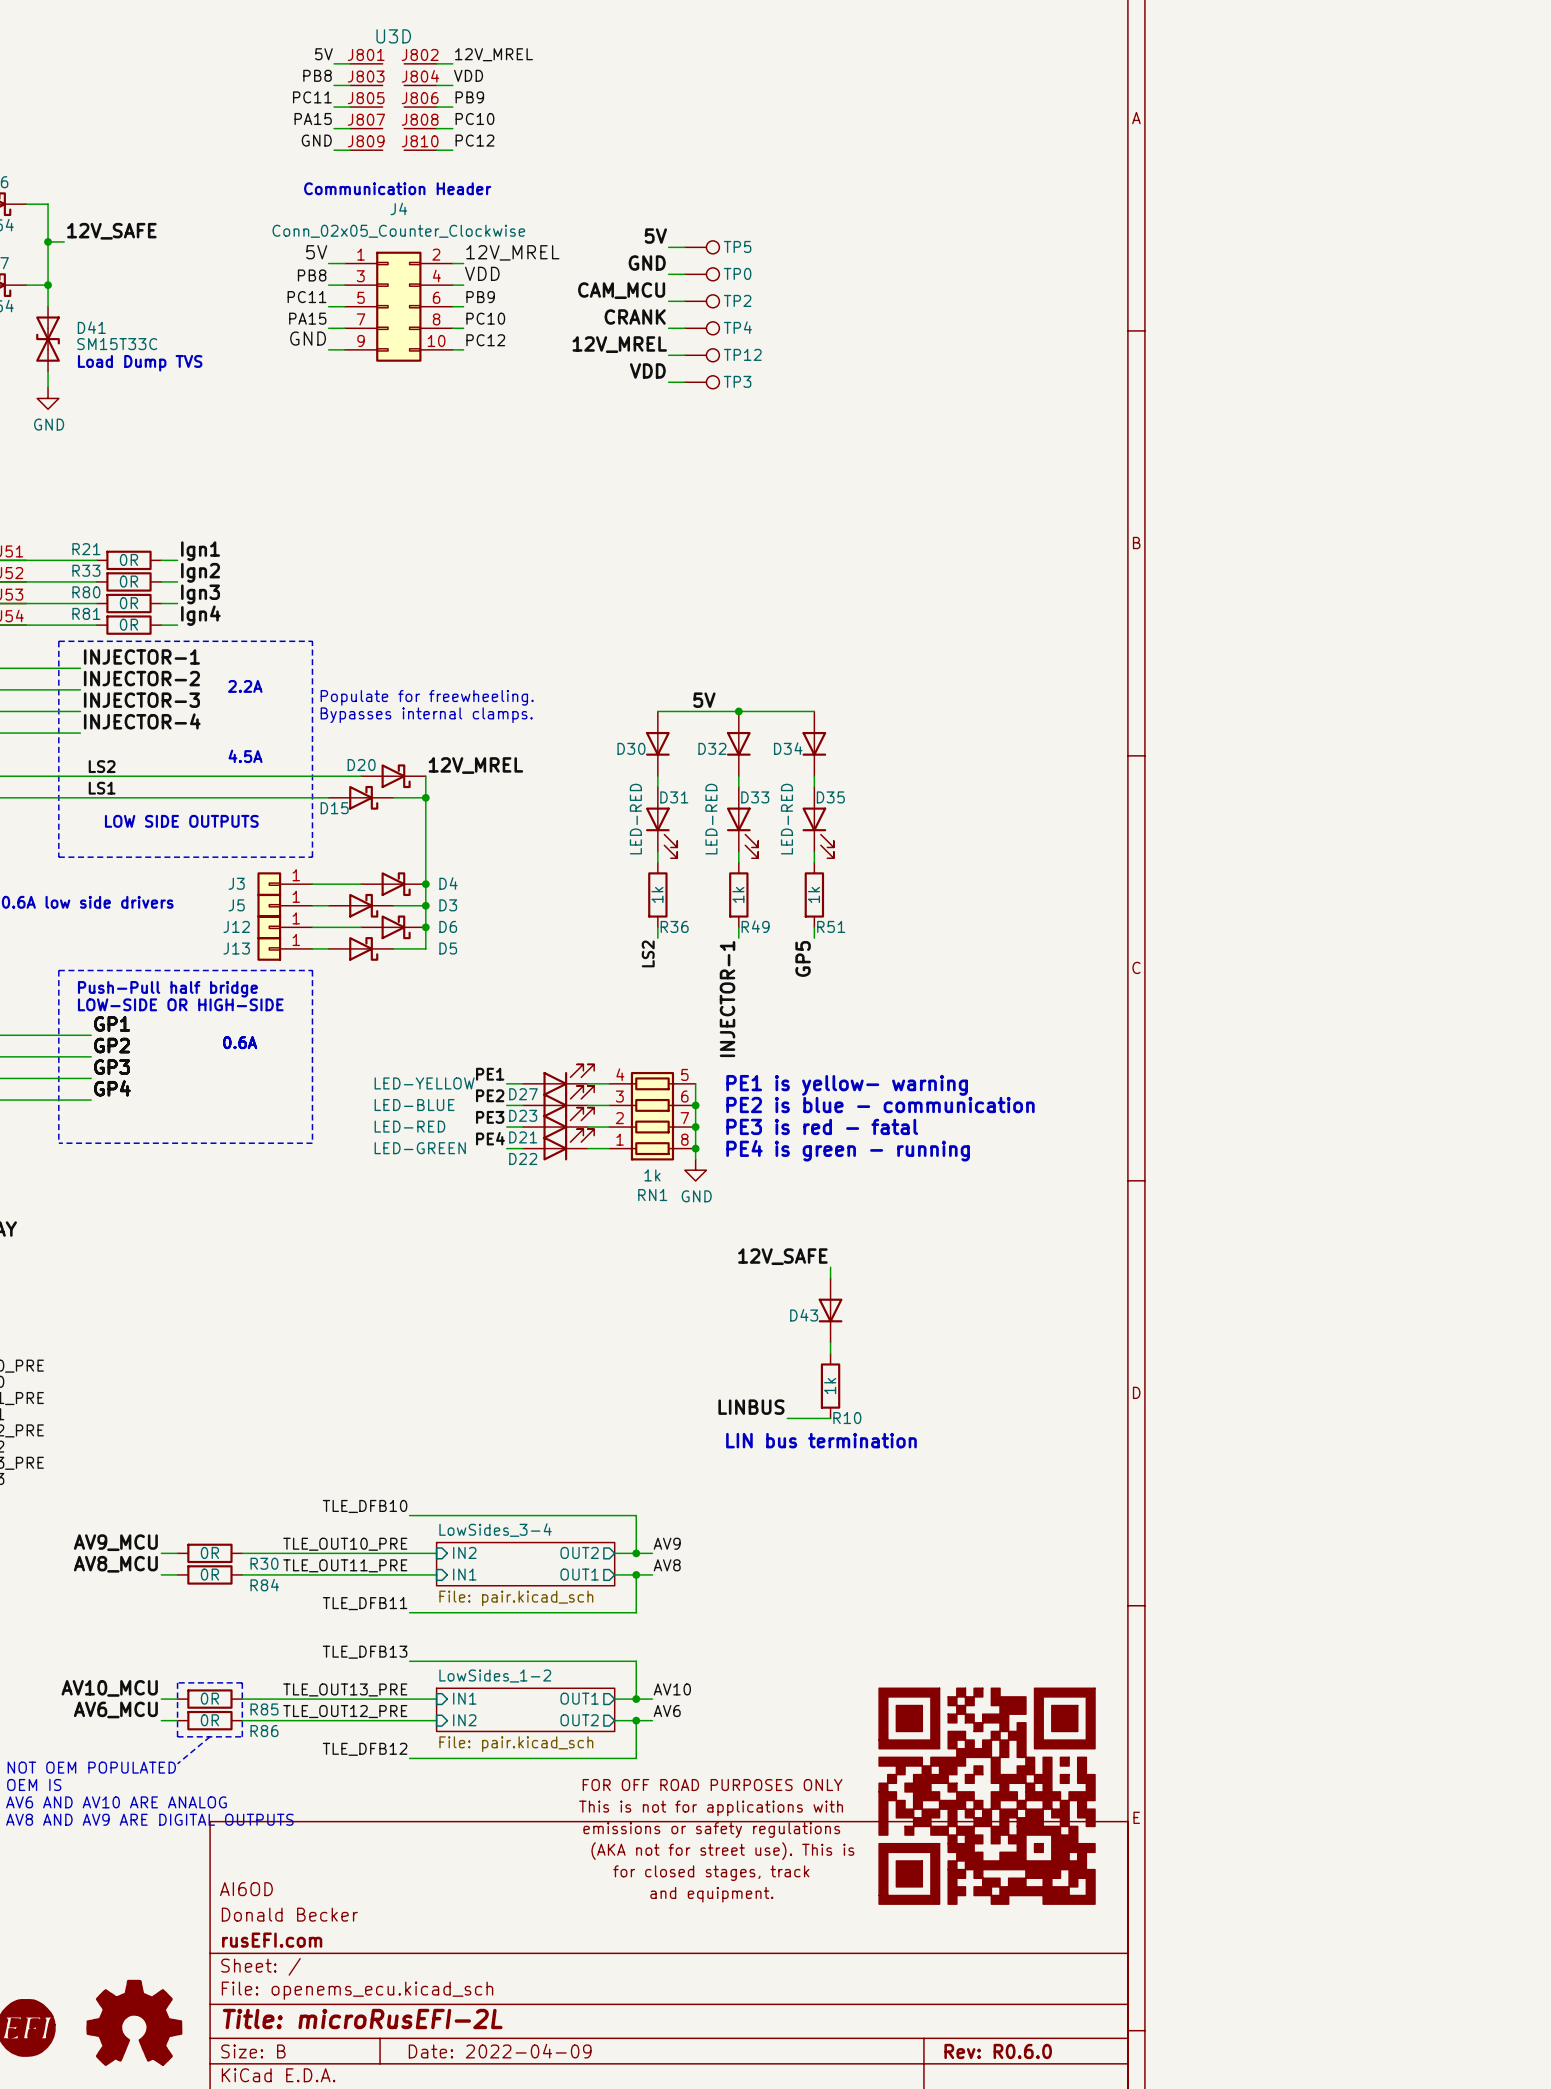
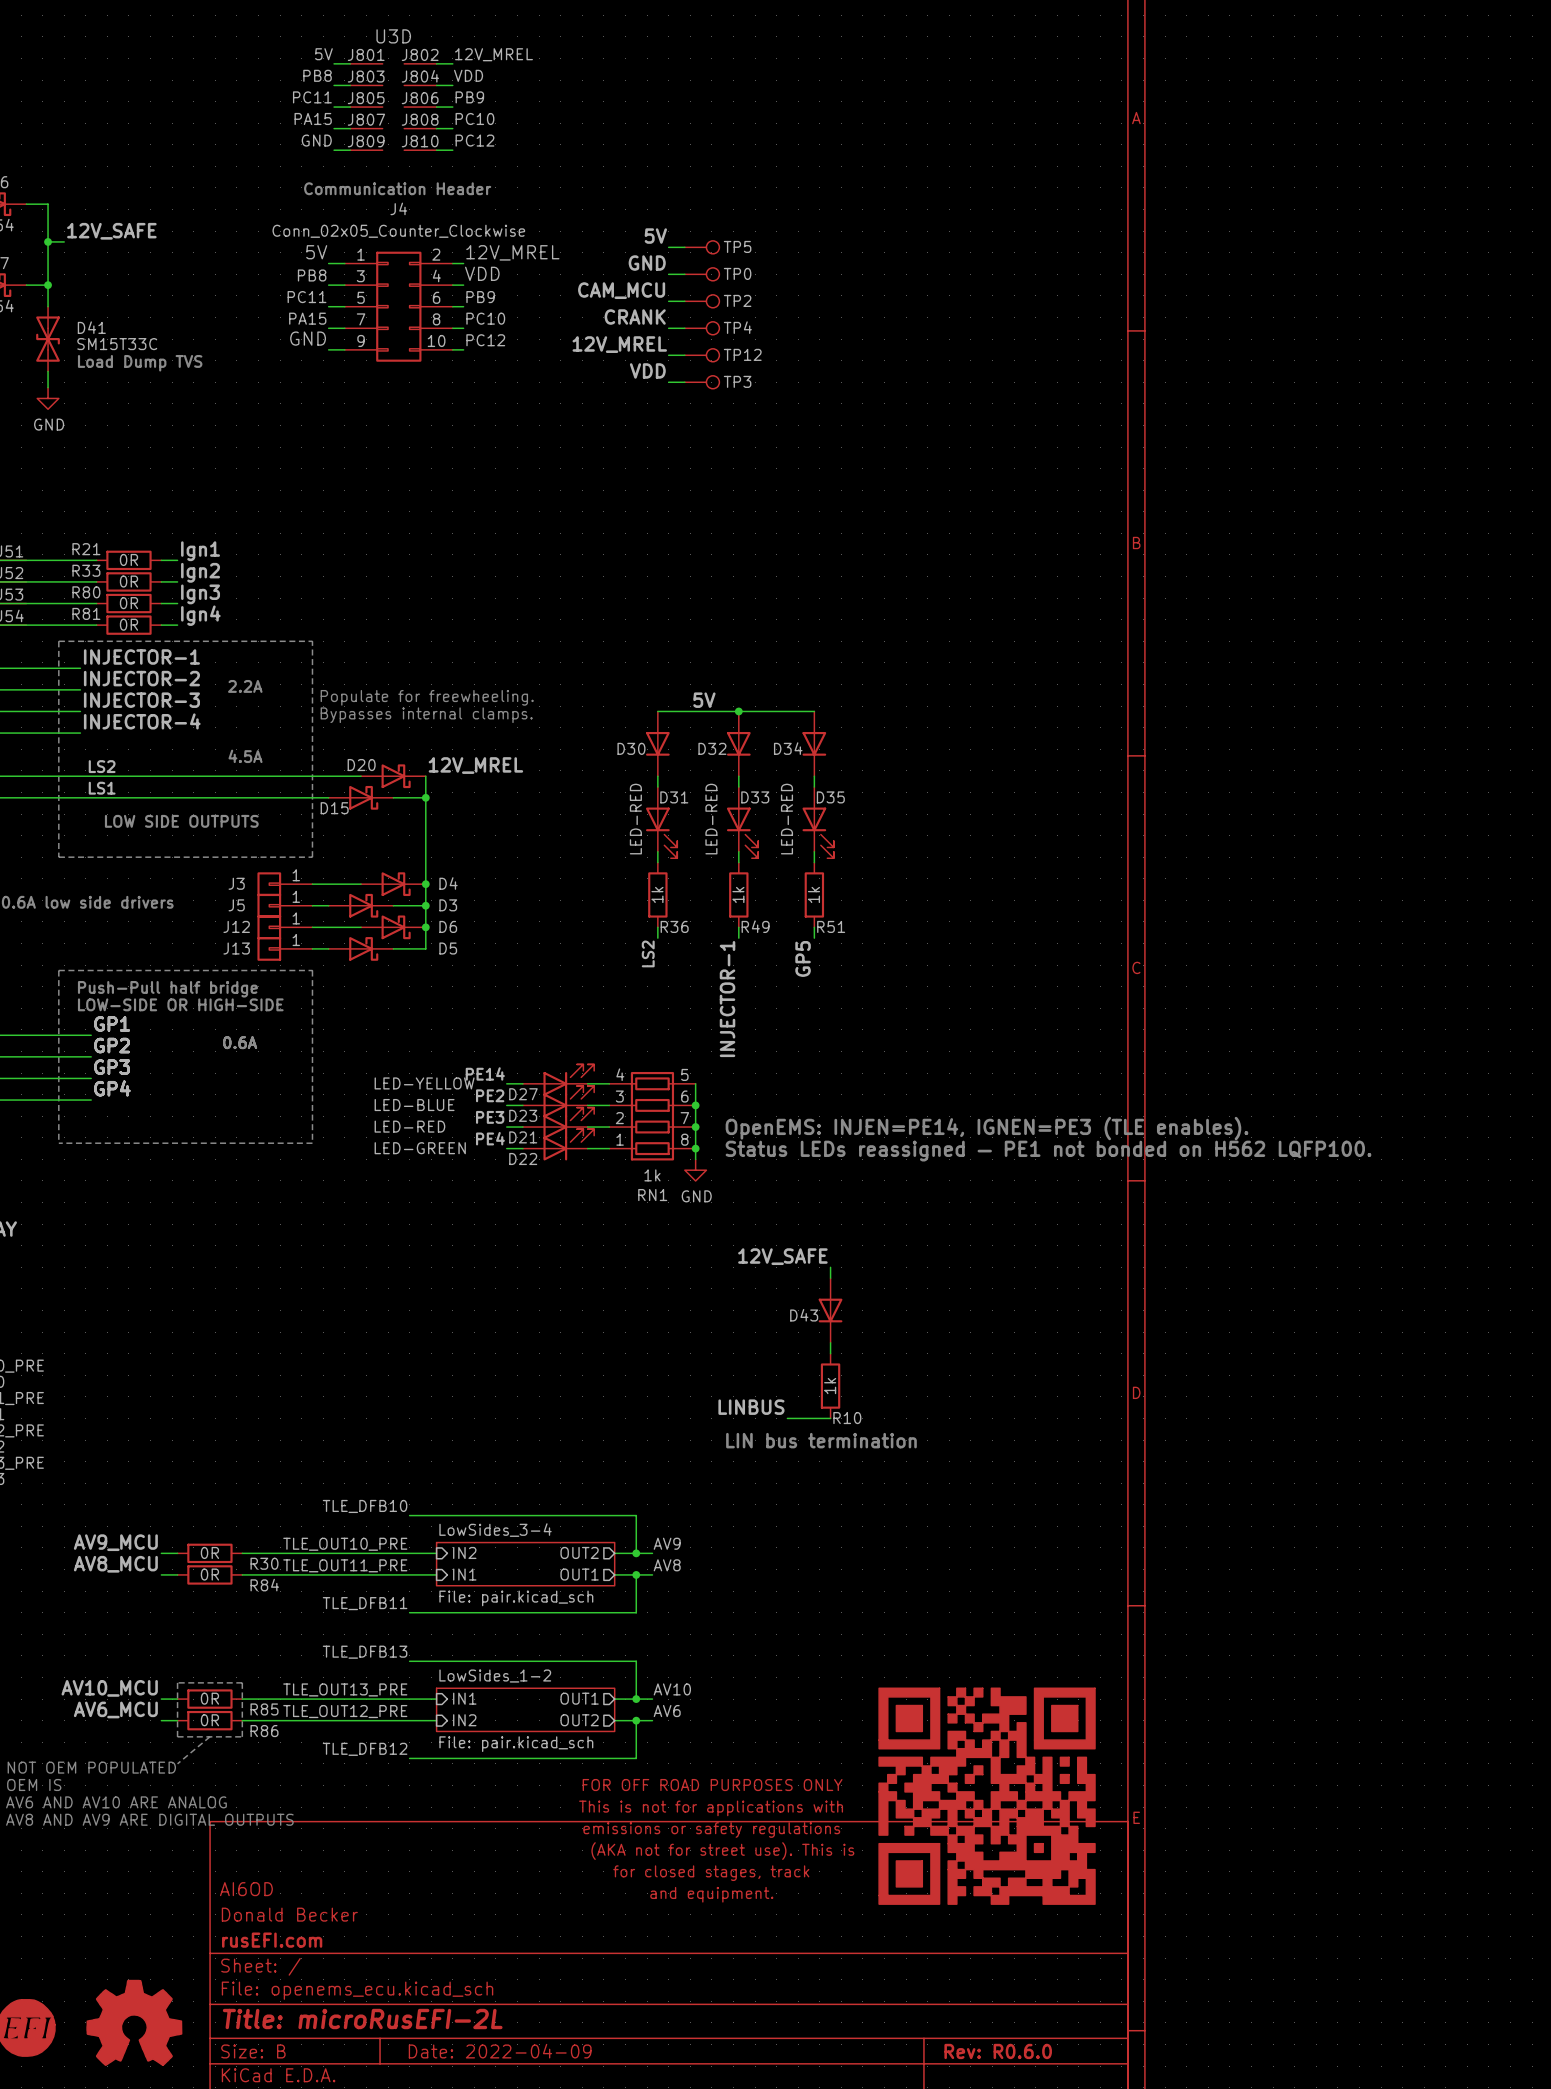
label: PE1 (490, 1074) -> PE14 (485, 1073)
text: PE1 is yellow- warning (847, 1085) -> none
text: PE2 is blue - communication (880, 1105) -> none
text: PE3 is red - fatal (822, 1126) -> OpenEMS: INJEN=PE14, IGNEN=PE3 (TLE enables). (987, 1128)
text: PE4 is green - running (848, 1150) -> Status LEDs reassigned — PE1 not bonded on H562 LQFP100. (1048, 1151)

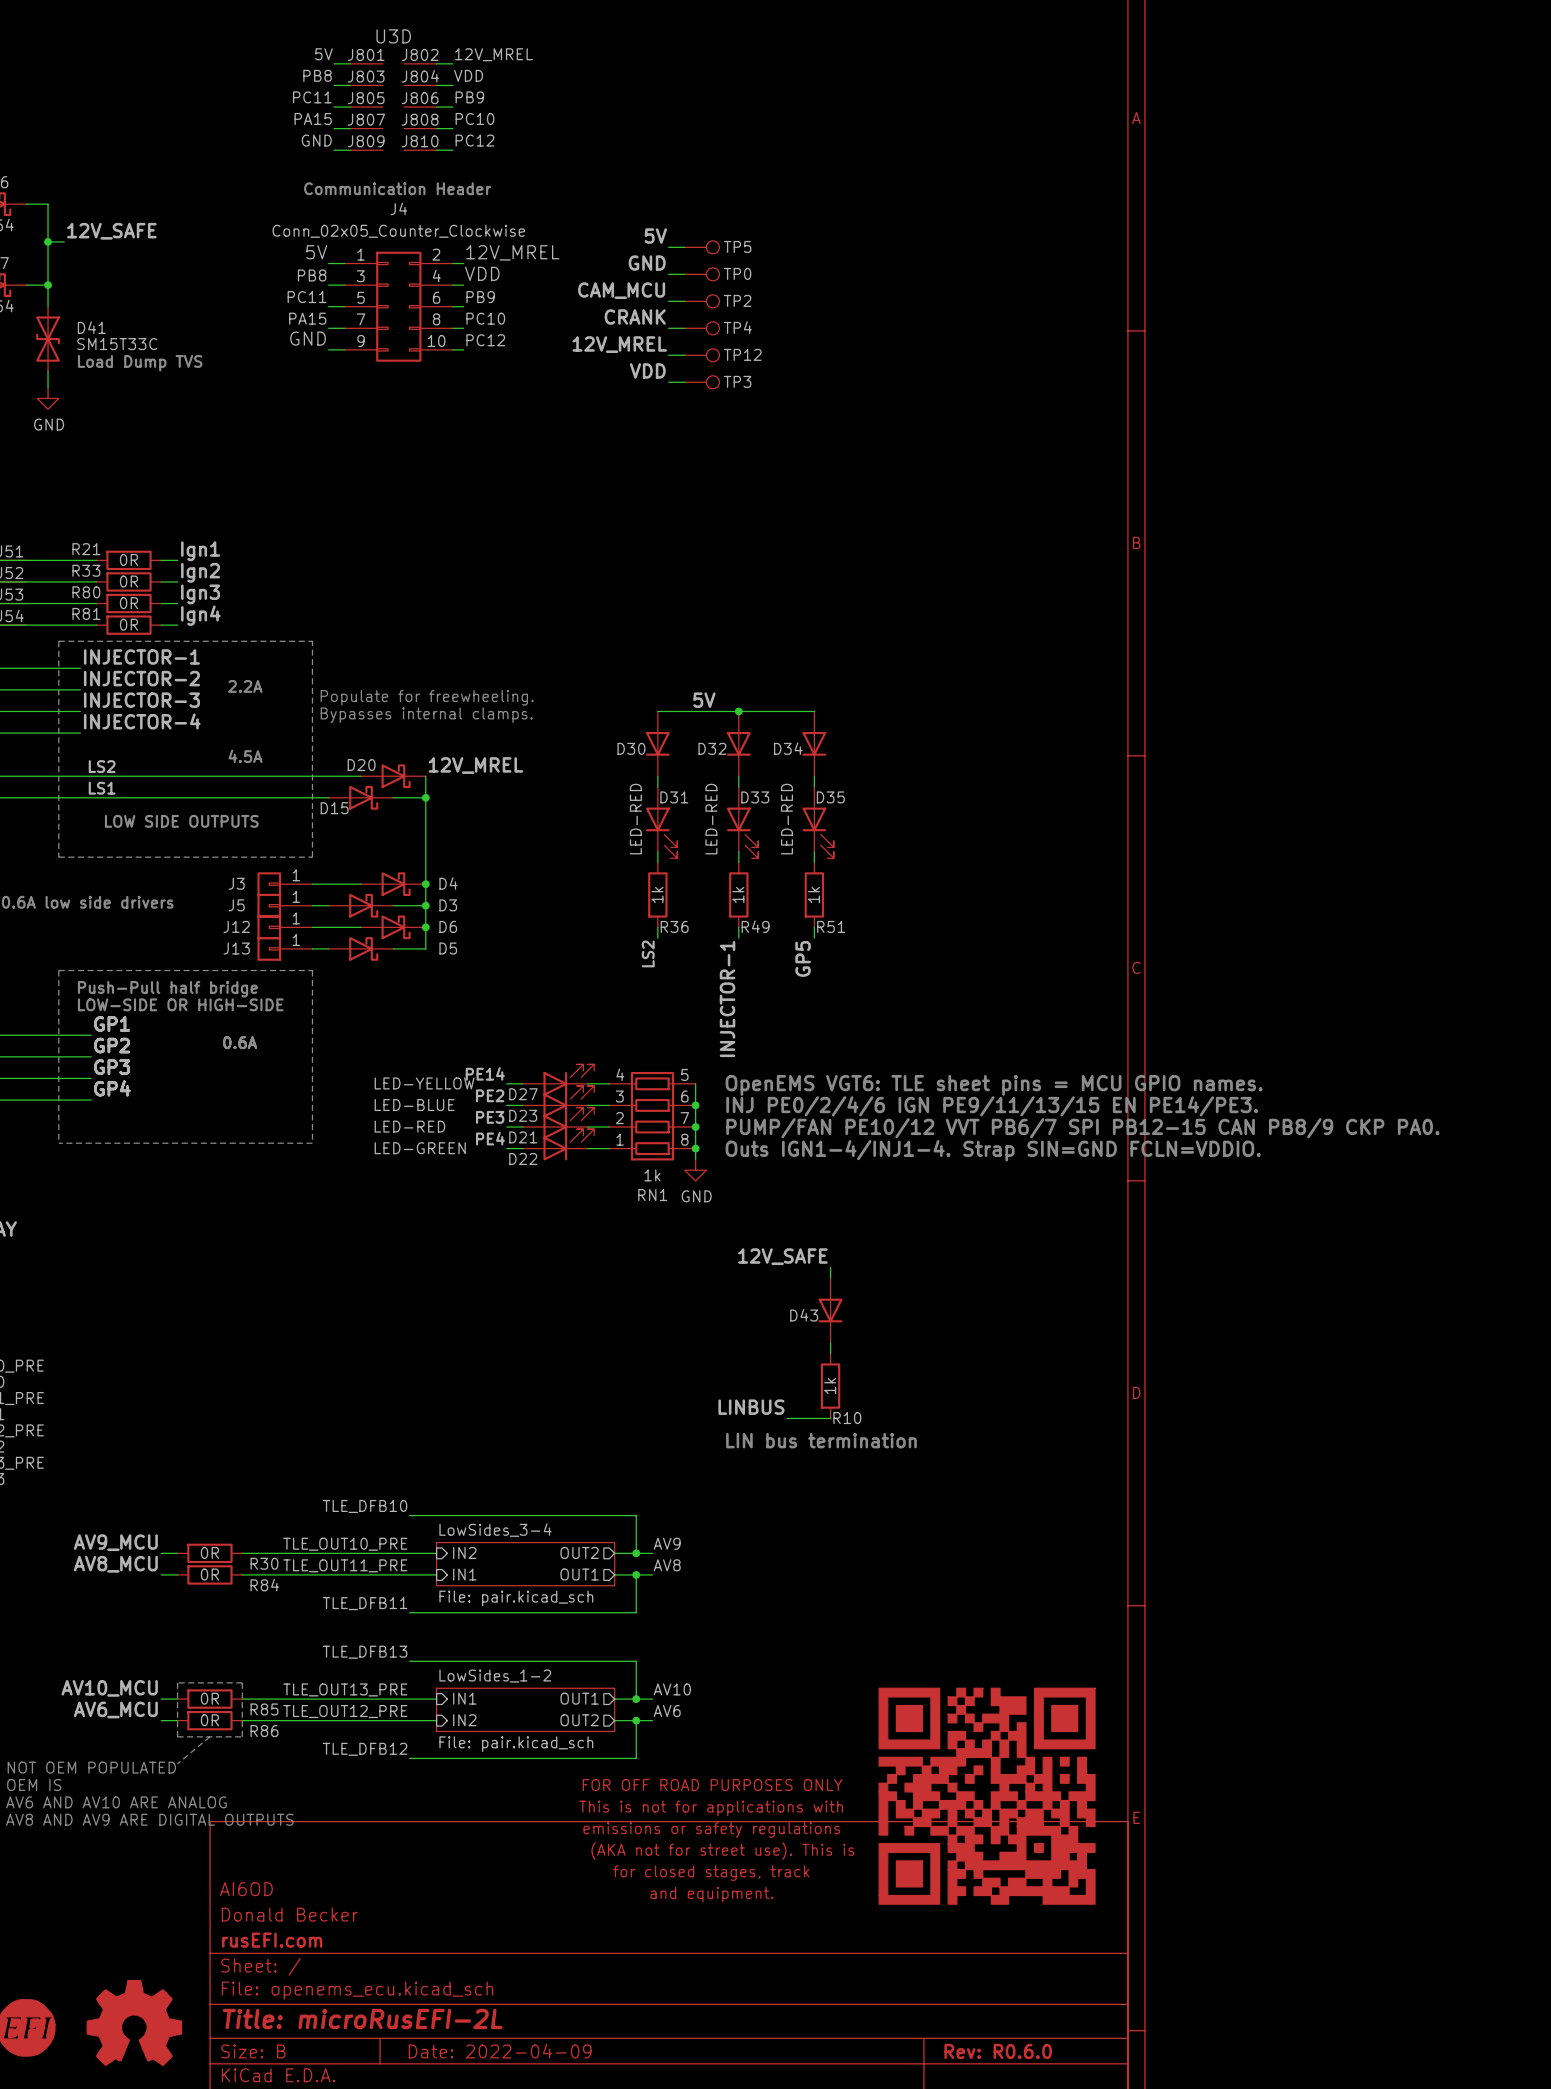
text: none -> OpenEMS VGT6: TLE sheet pins = MCU GPIO names. (994, 1085)
text: none -> INJ PE0/2/4/6 IGN PE9/11/13/15 EN PE14/PE3. (992, 1106)
text: OpenEMS: INJEN=PE14, IGNEN=PE3 (TLE enables). (987, 1128) -> PUMP/FAN PE10/12 VVT PB6/7 SPI PB12-15 CAN PB8/9 CKP PA0. (1082, 1128)
text: Status LEDs reassigned — PE1 not bonded on H562 LQFP100. (1048, 1151) -> Outs IGN1-4/INJ1-4. Strap SIN=GND FCLN=VDDIO. (993, 1150)

